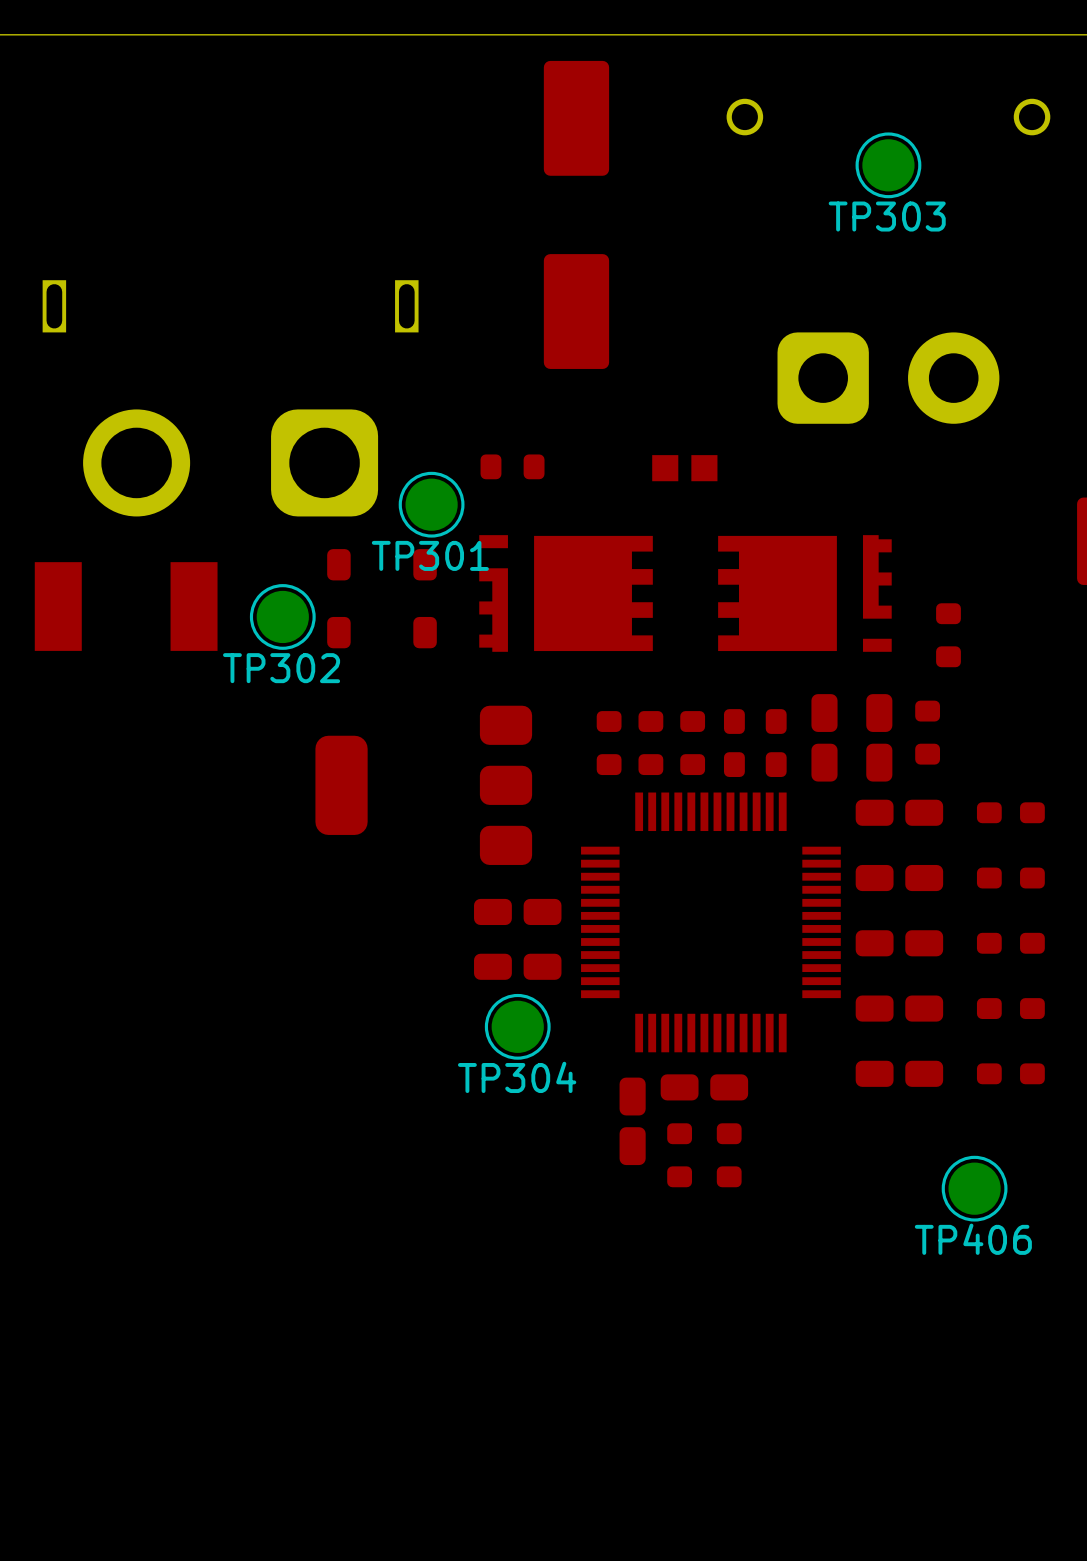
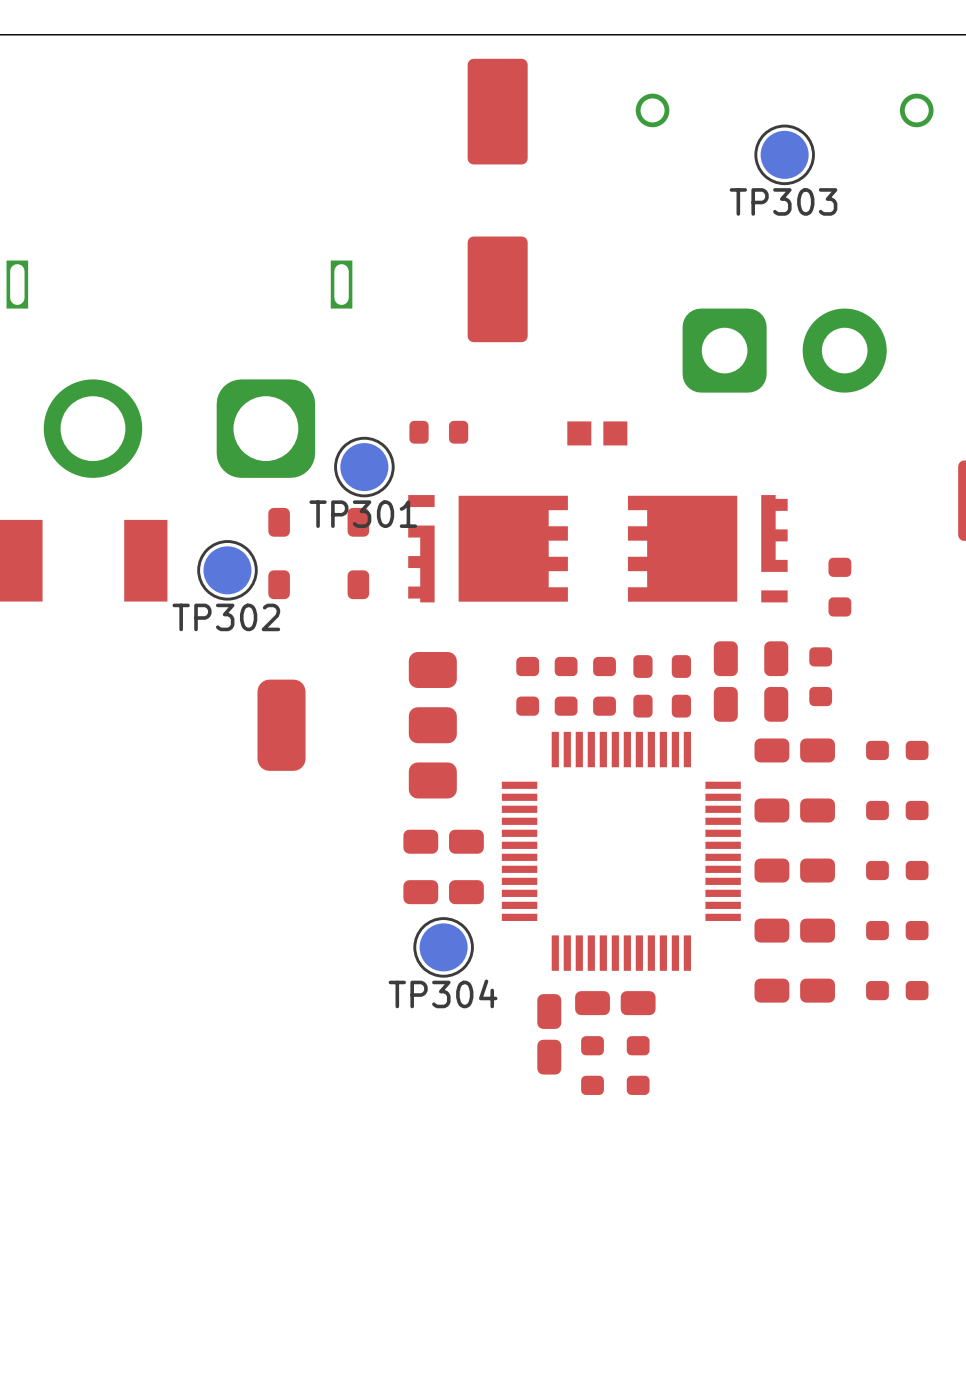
TP406: (974, 1188) -> none

